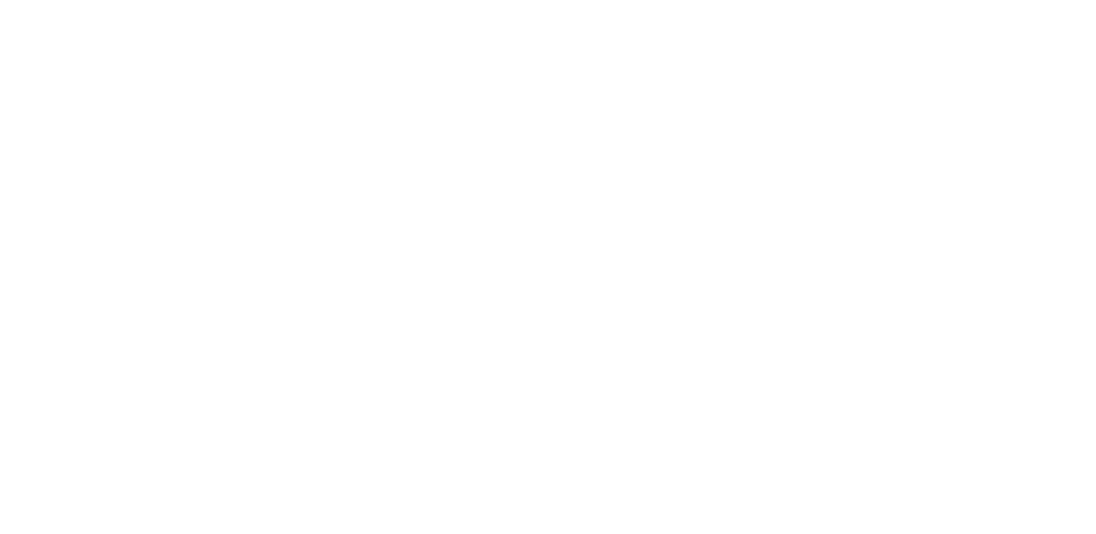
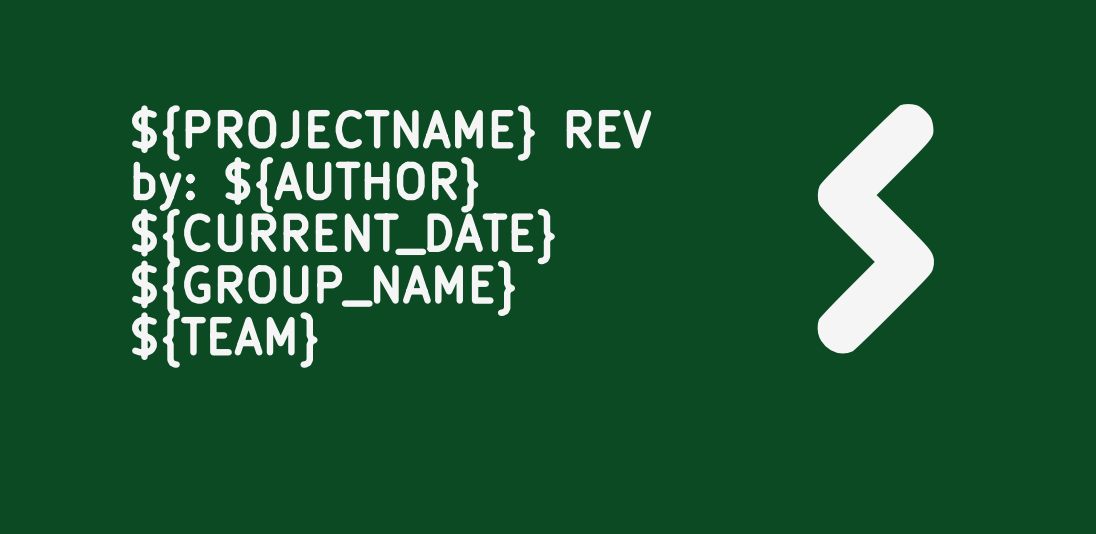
drawing: none -> [817, 104, 934, 354]
text: none -> ${PROJECTNAME} REV (391, 133)
text: none -> by: ${AUTHOR} (305, 184)
text: none -> ${CURRENT_DATE} (343, 236)
text: none -> ${GROUP_NAME} (323, 288)
text: none -> ${TEAM} (224, 340)

